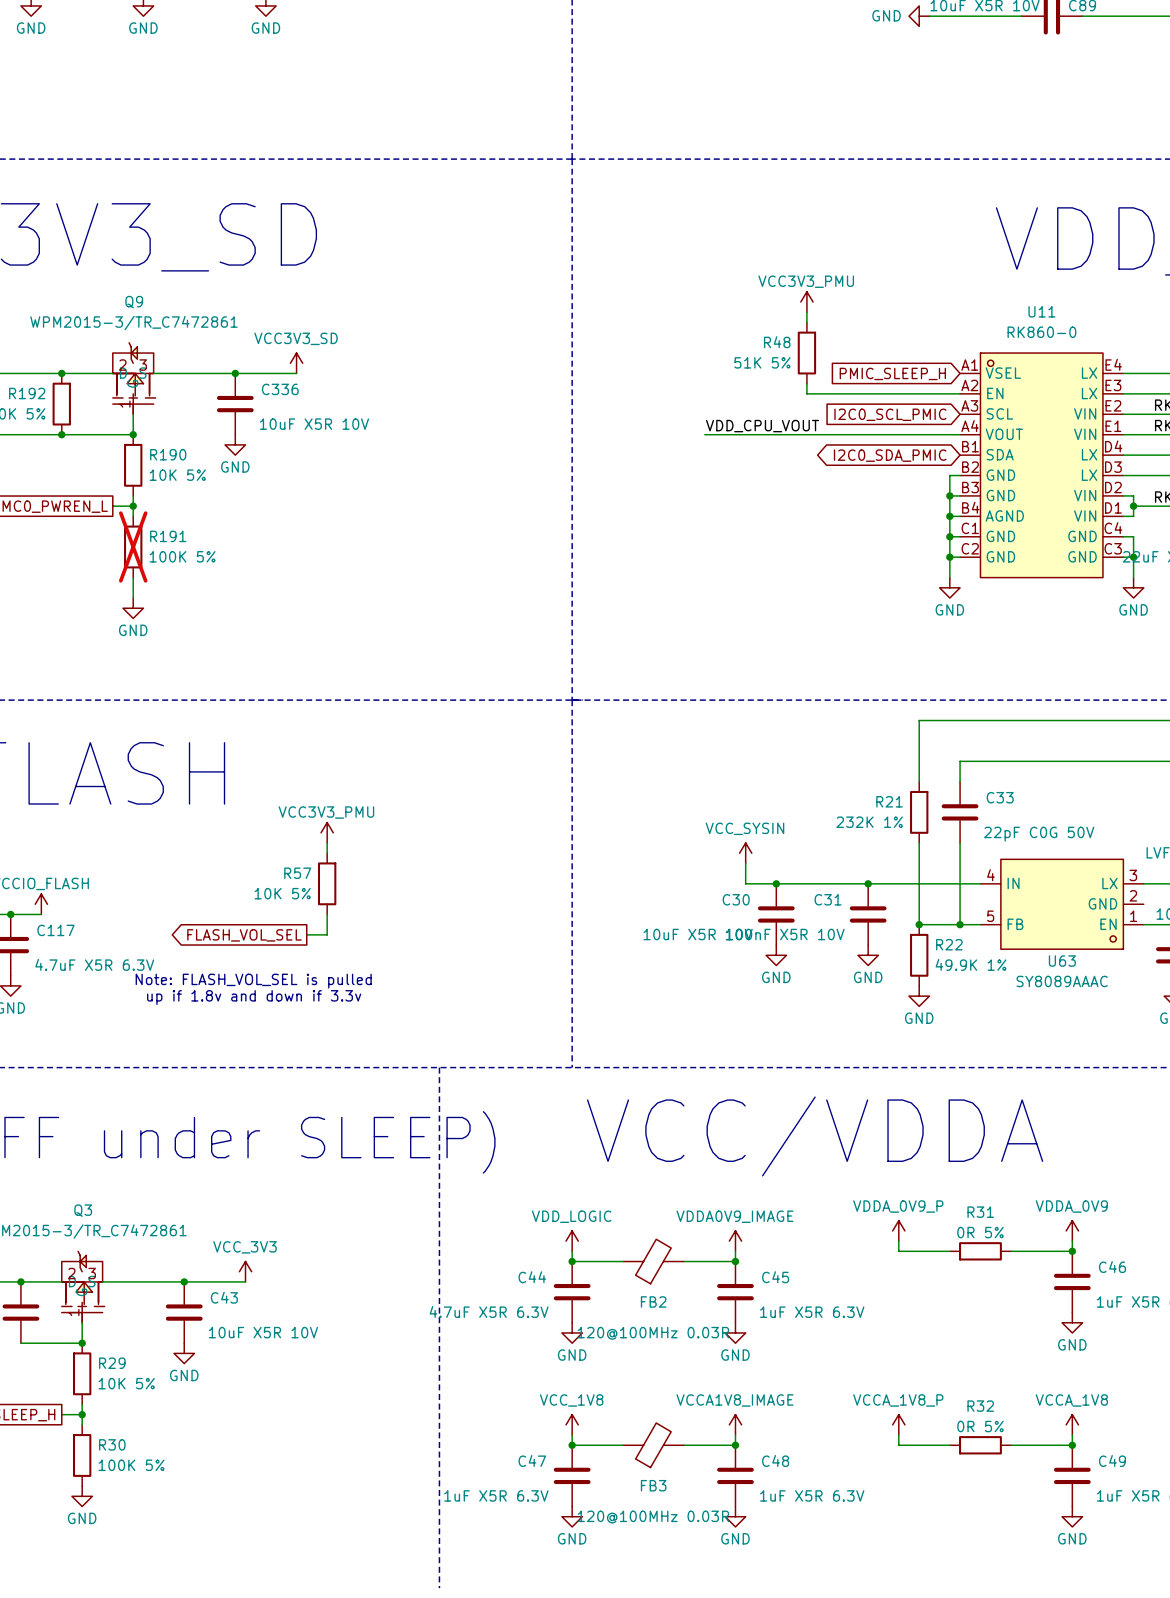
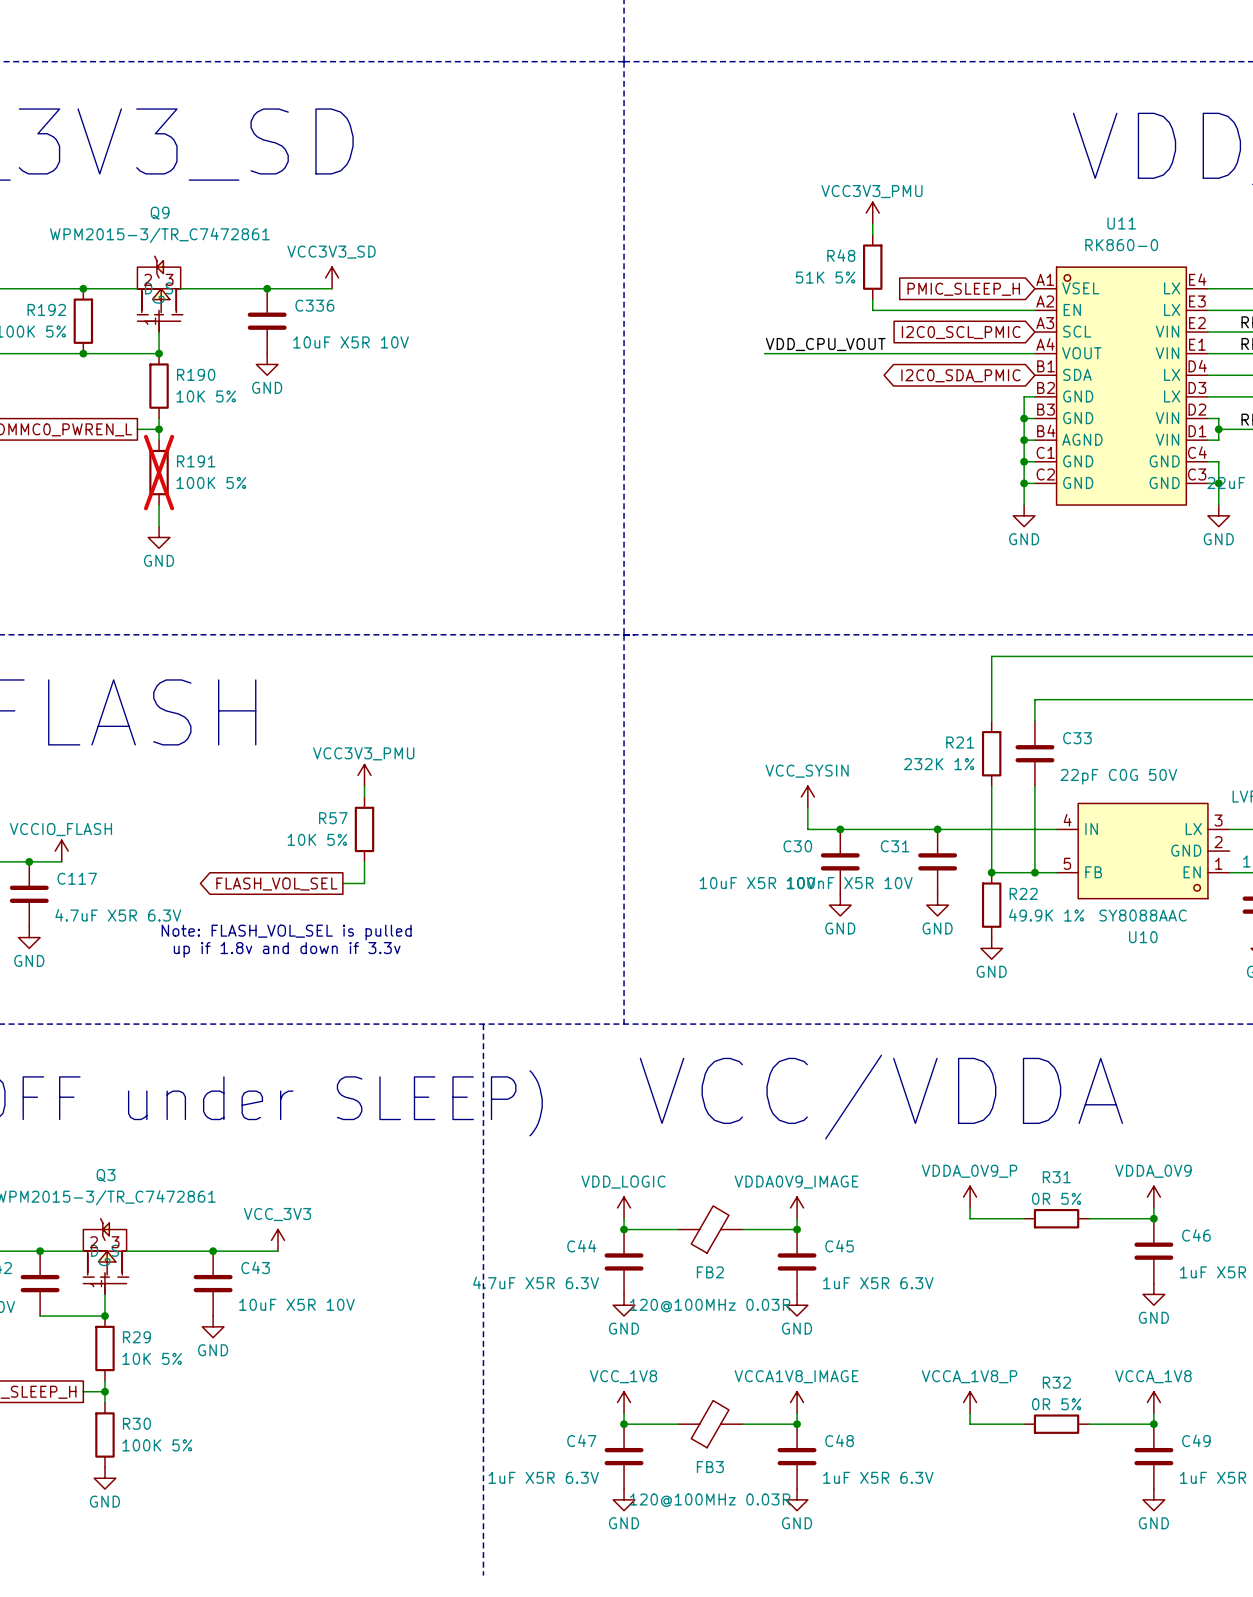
U63 name: U63 (1062, 961) -> U10 (1143, 937)
U63 value: SY8089AAAC (1062, 981) -> SY8088AAC (1143, 915)

